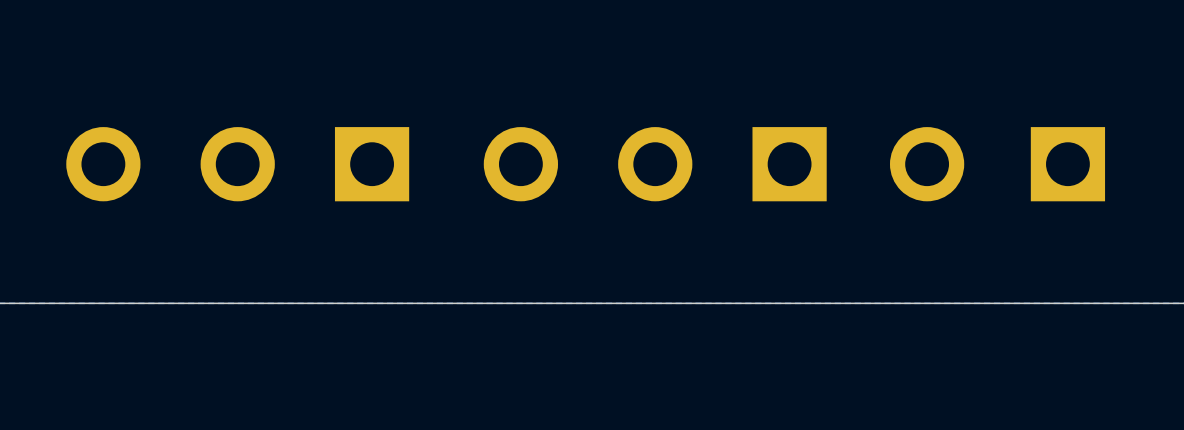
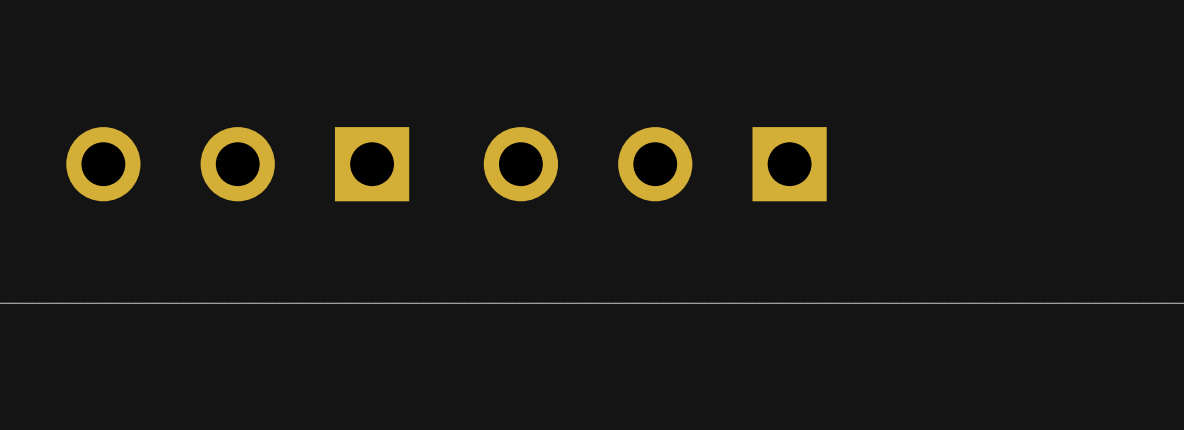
part: (997, 164) -> none

